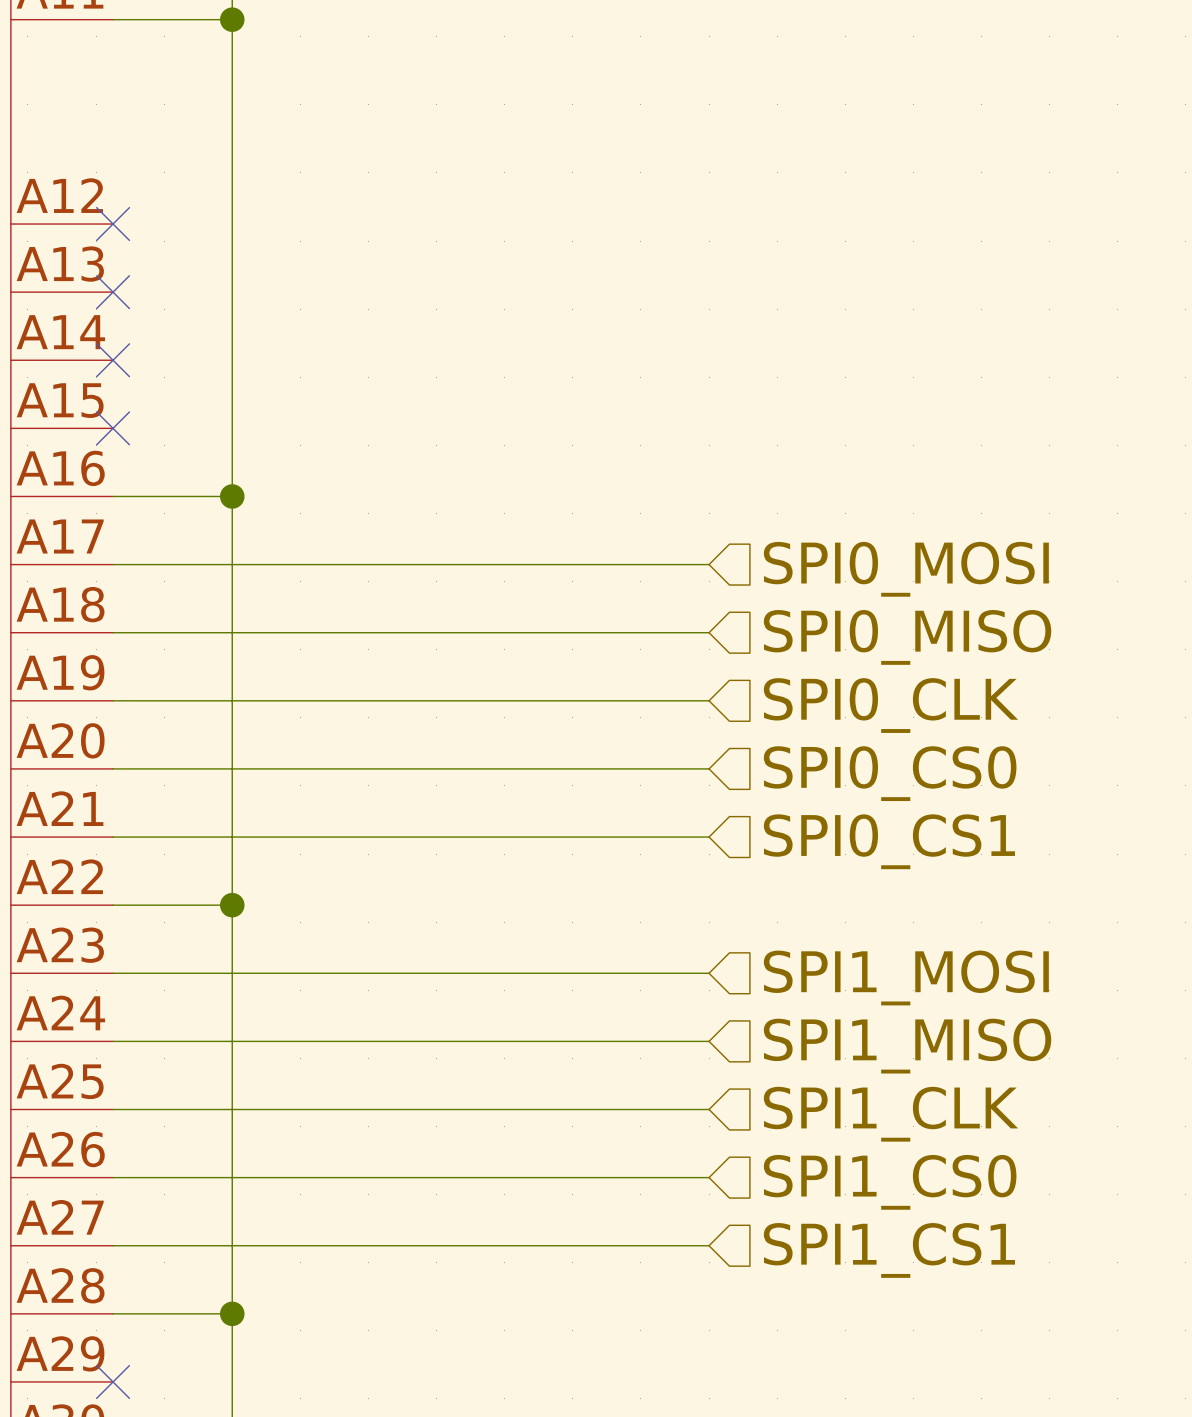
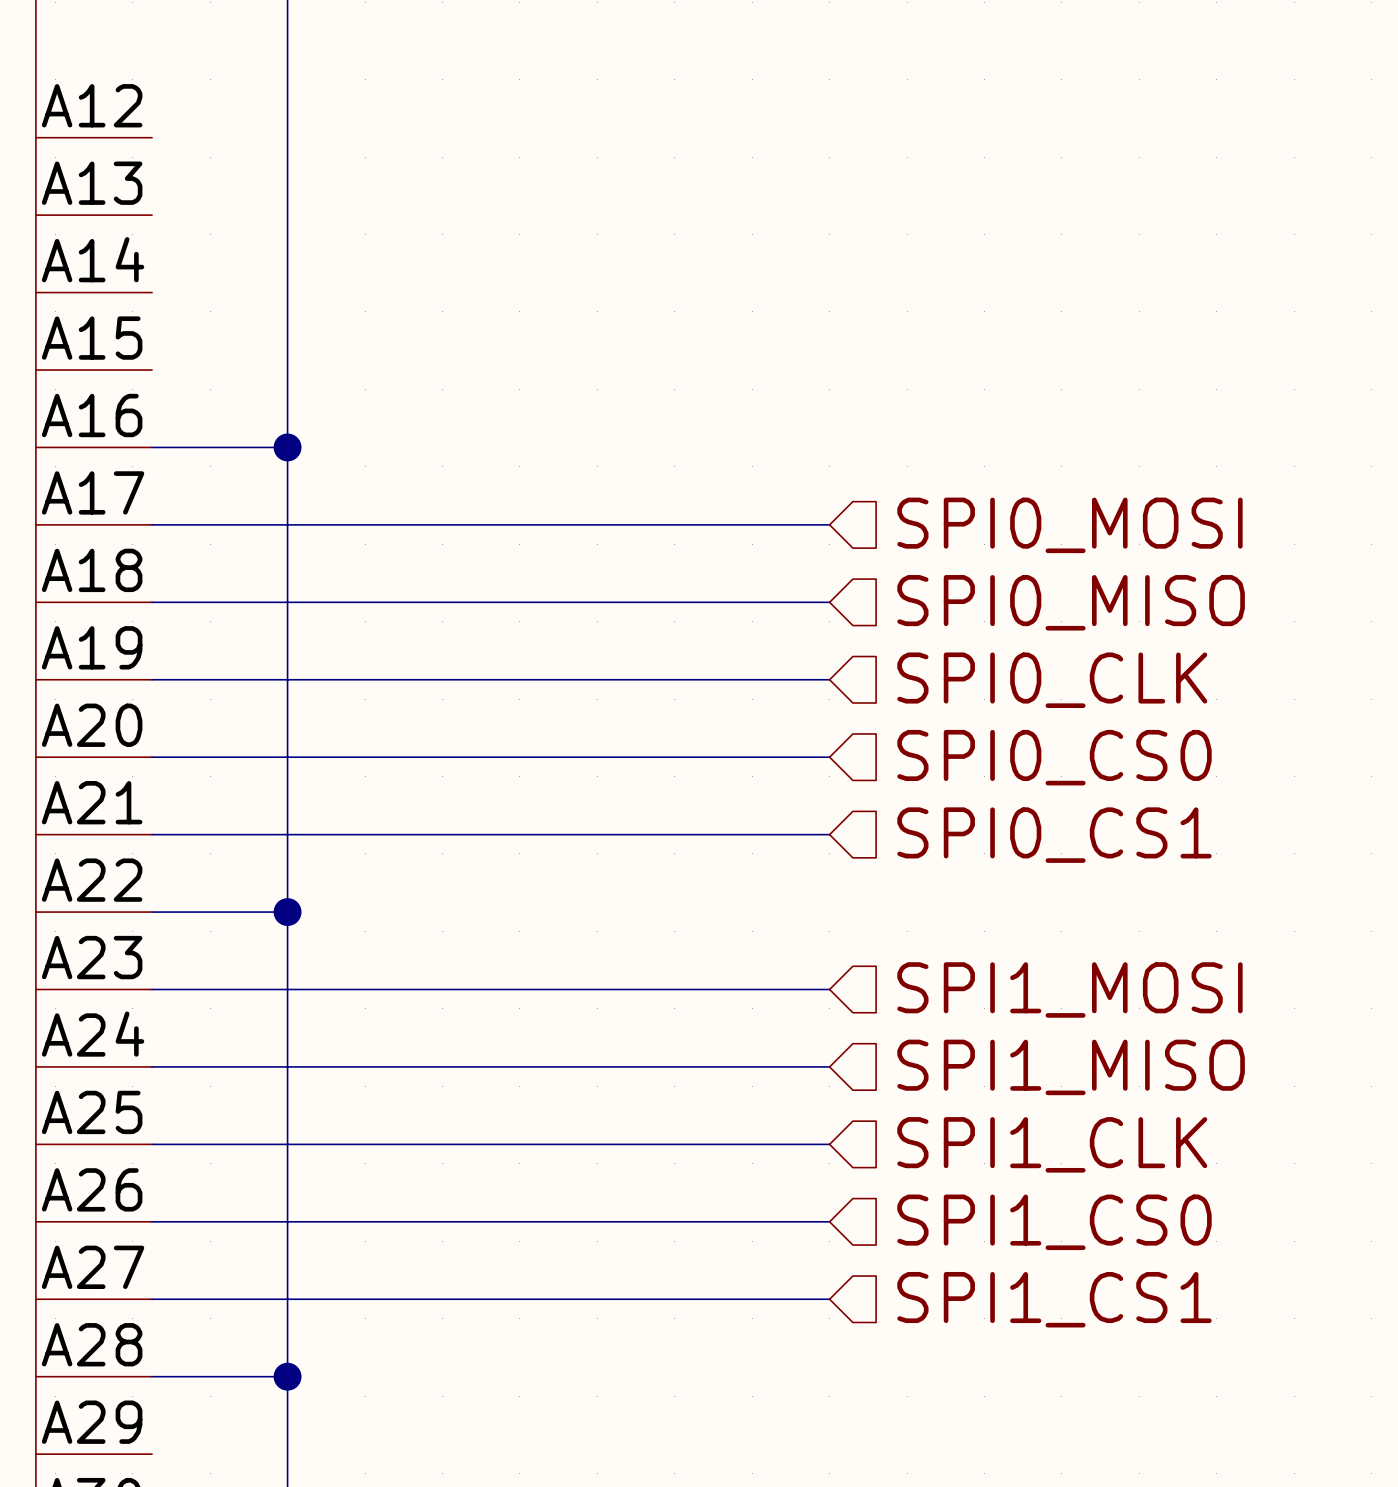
no-connect mark: (113, 224) -> none
no-connect mark: (113, 292) -> none
no-connect mark: (113, 360) -> none
no-connect mark: (113, 428) -> none
no-connect mark: (113, 1381) -> none

